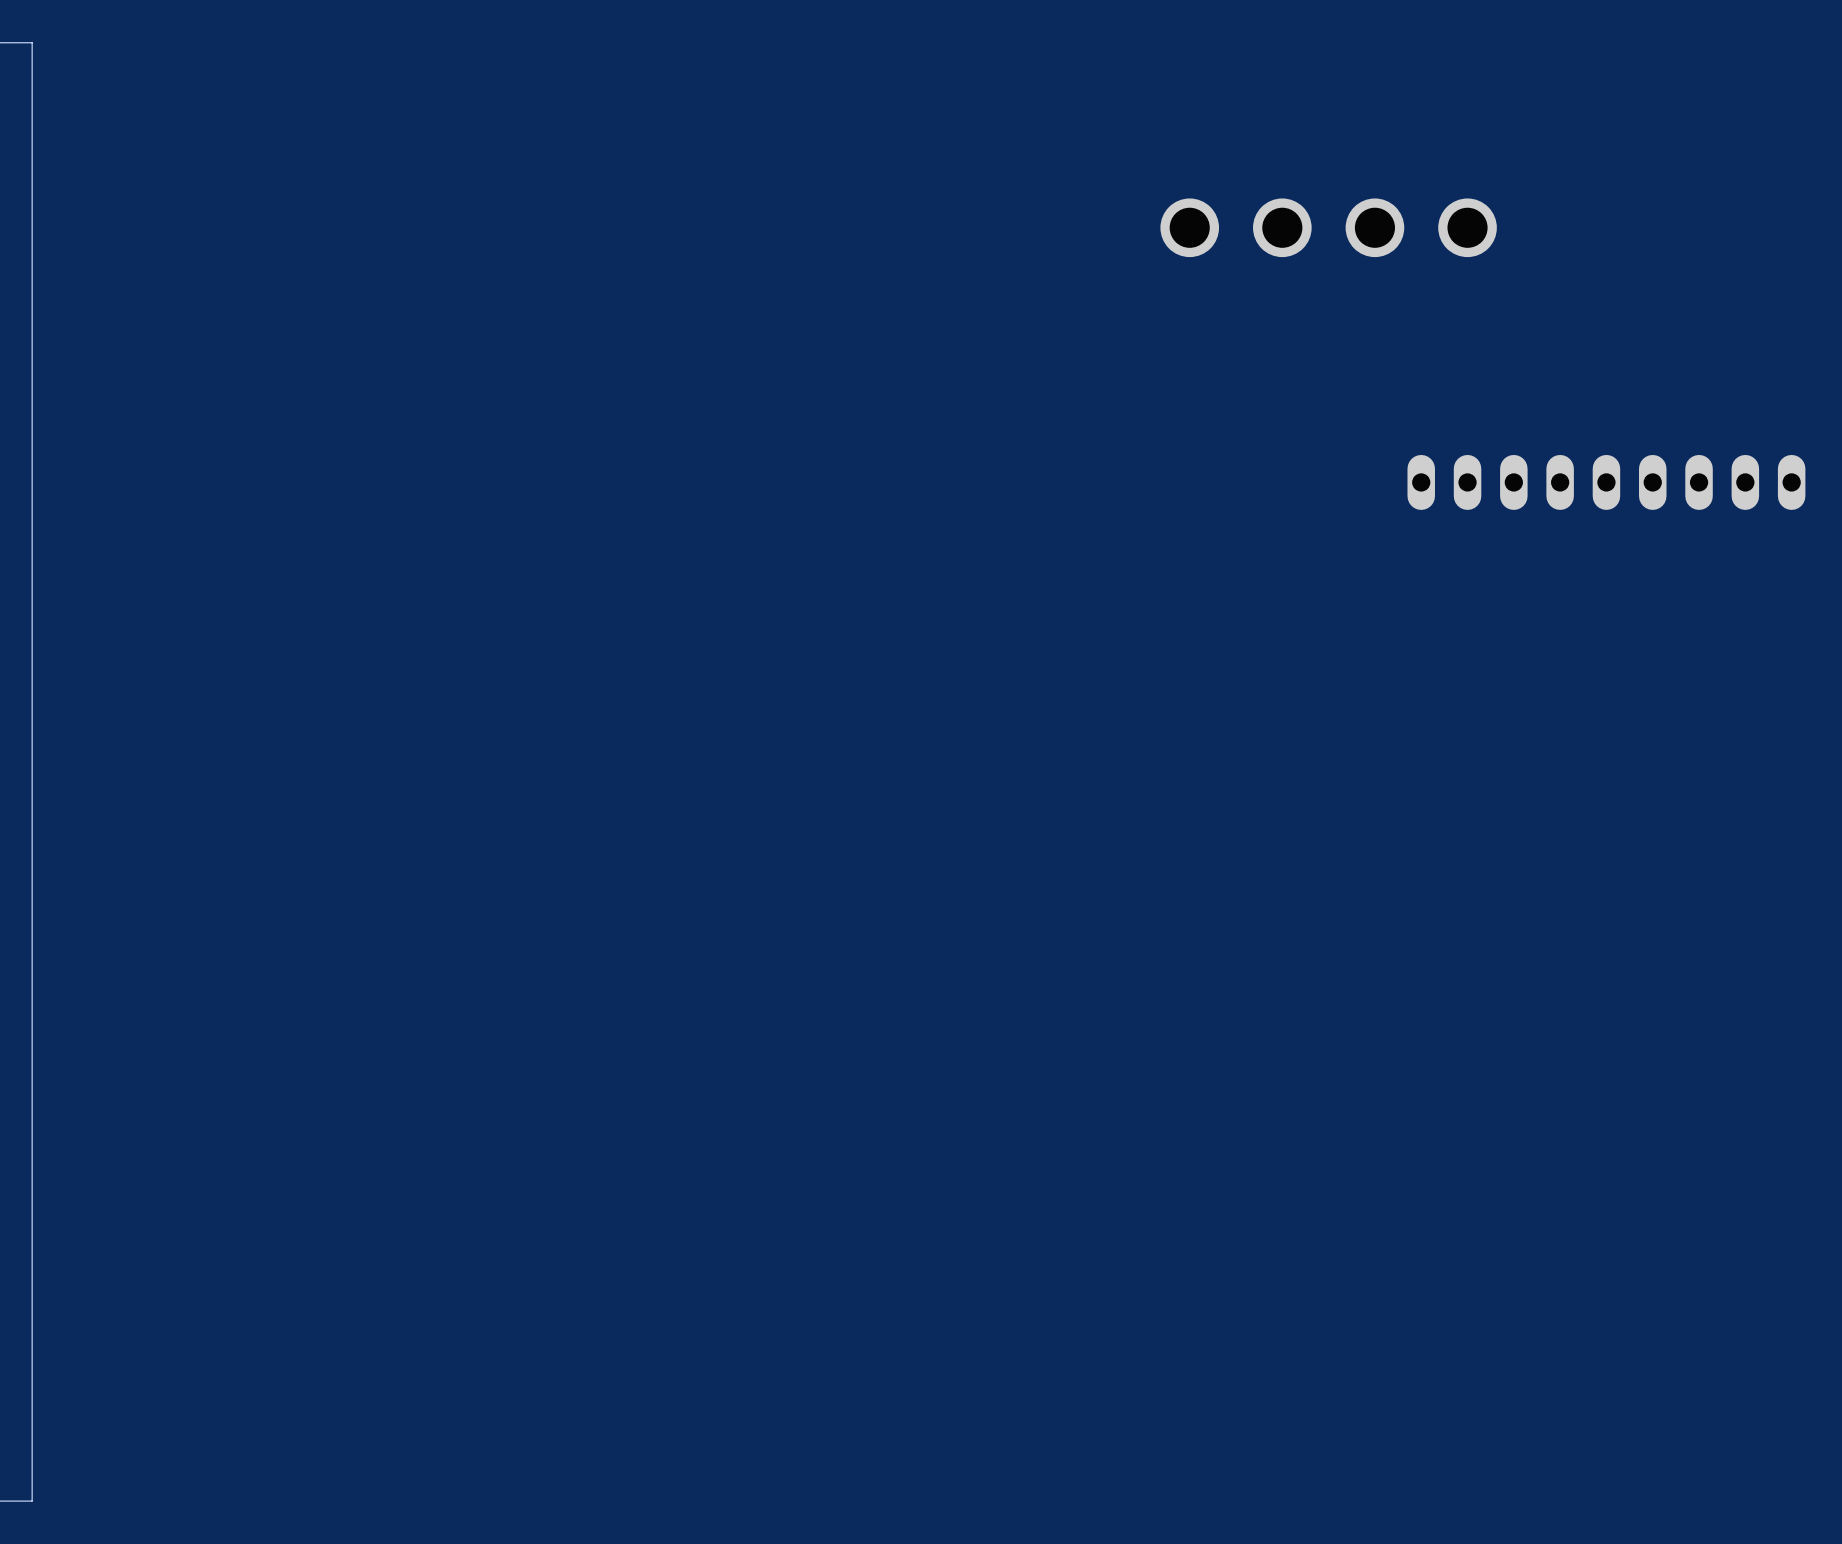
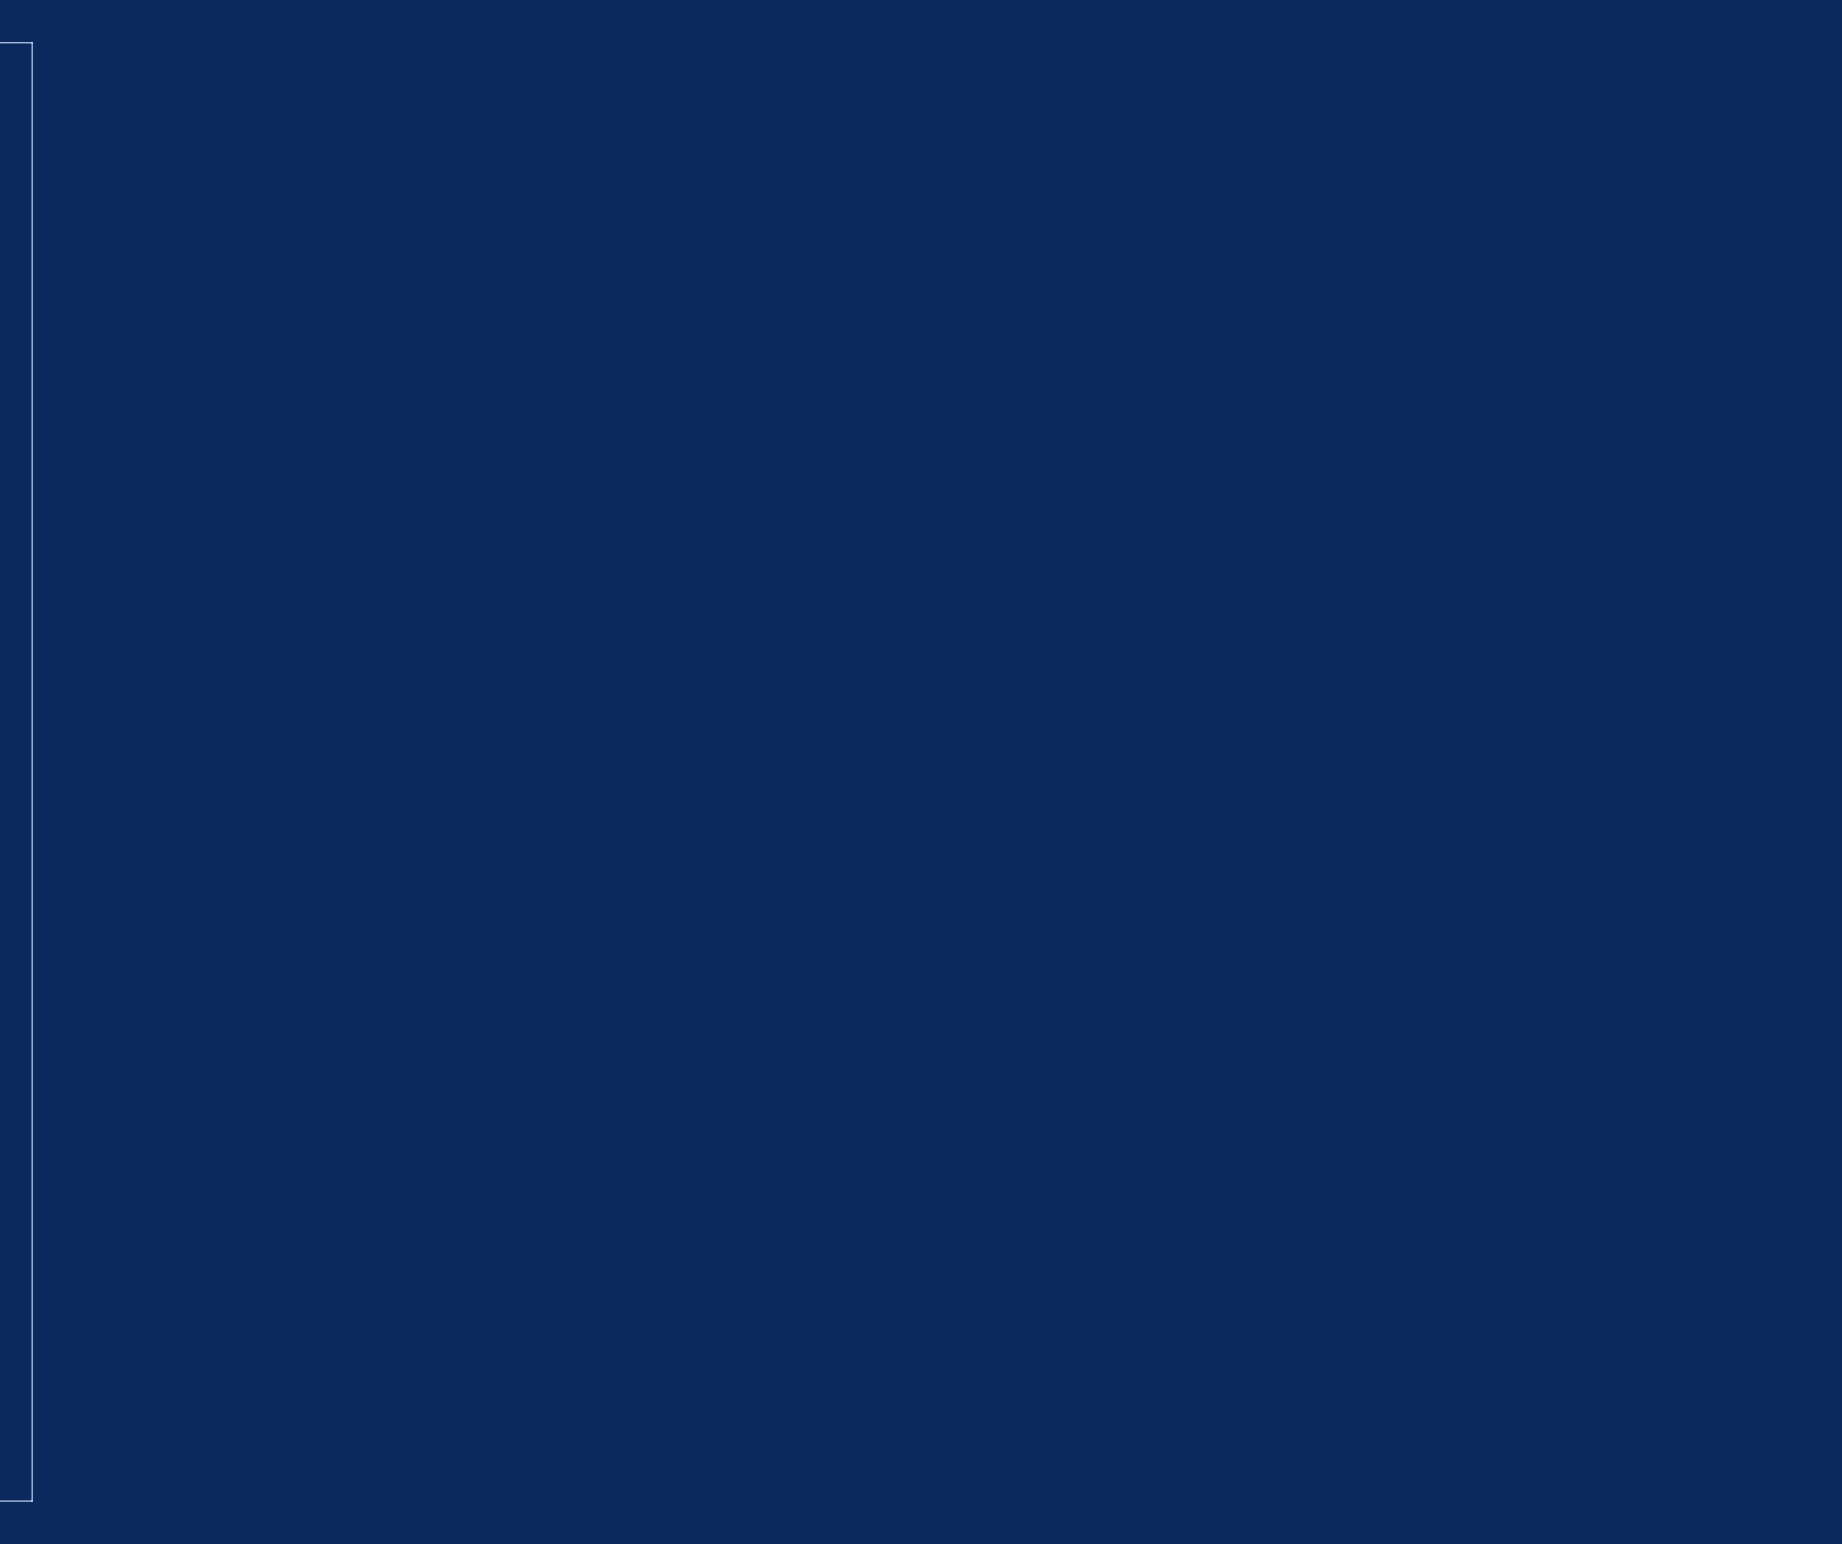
part: (1328, 227) -> none
part: (1606, 482) -> none

